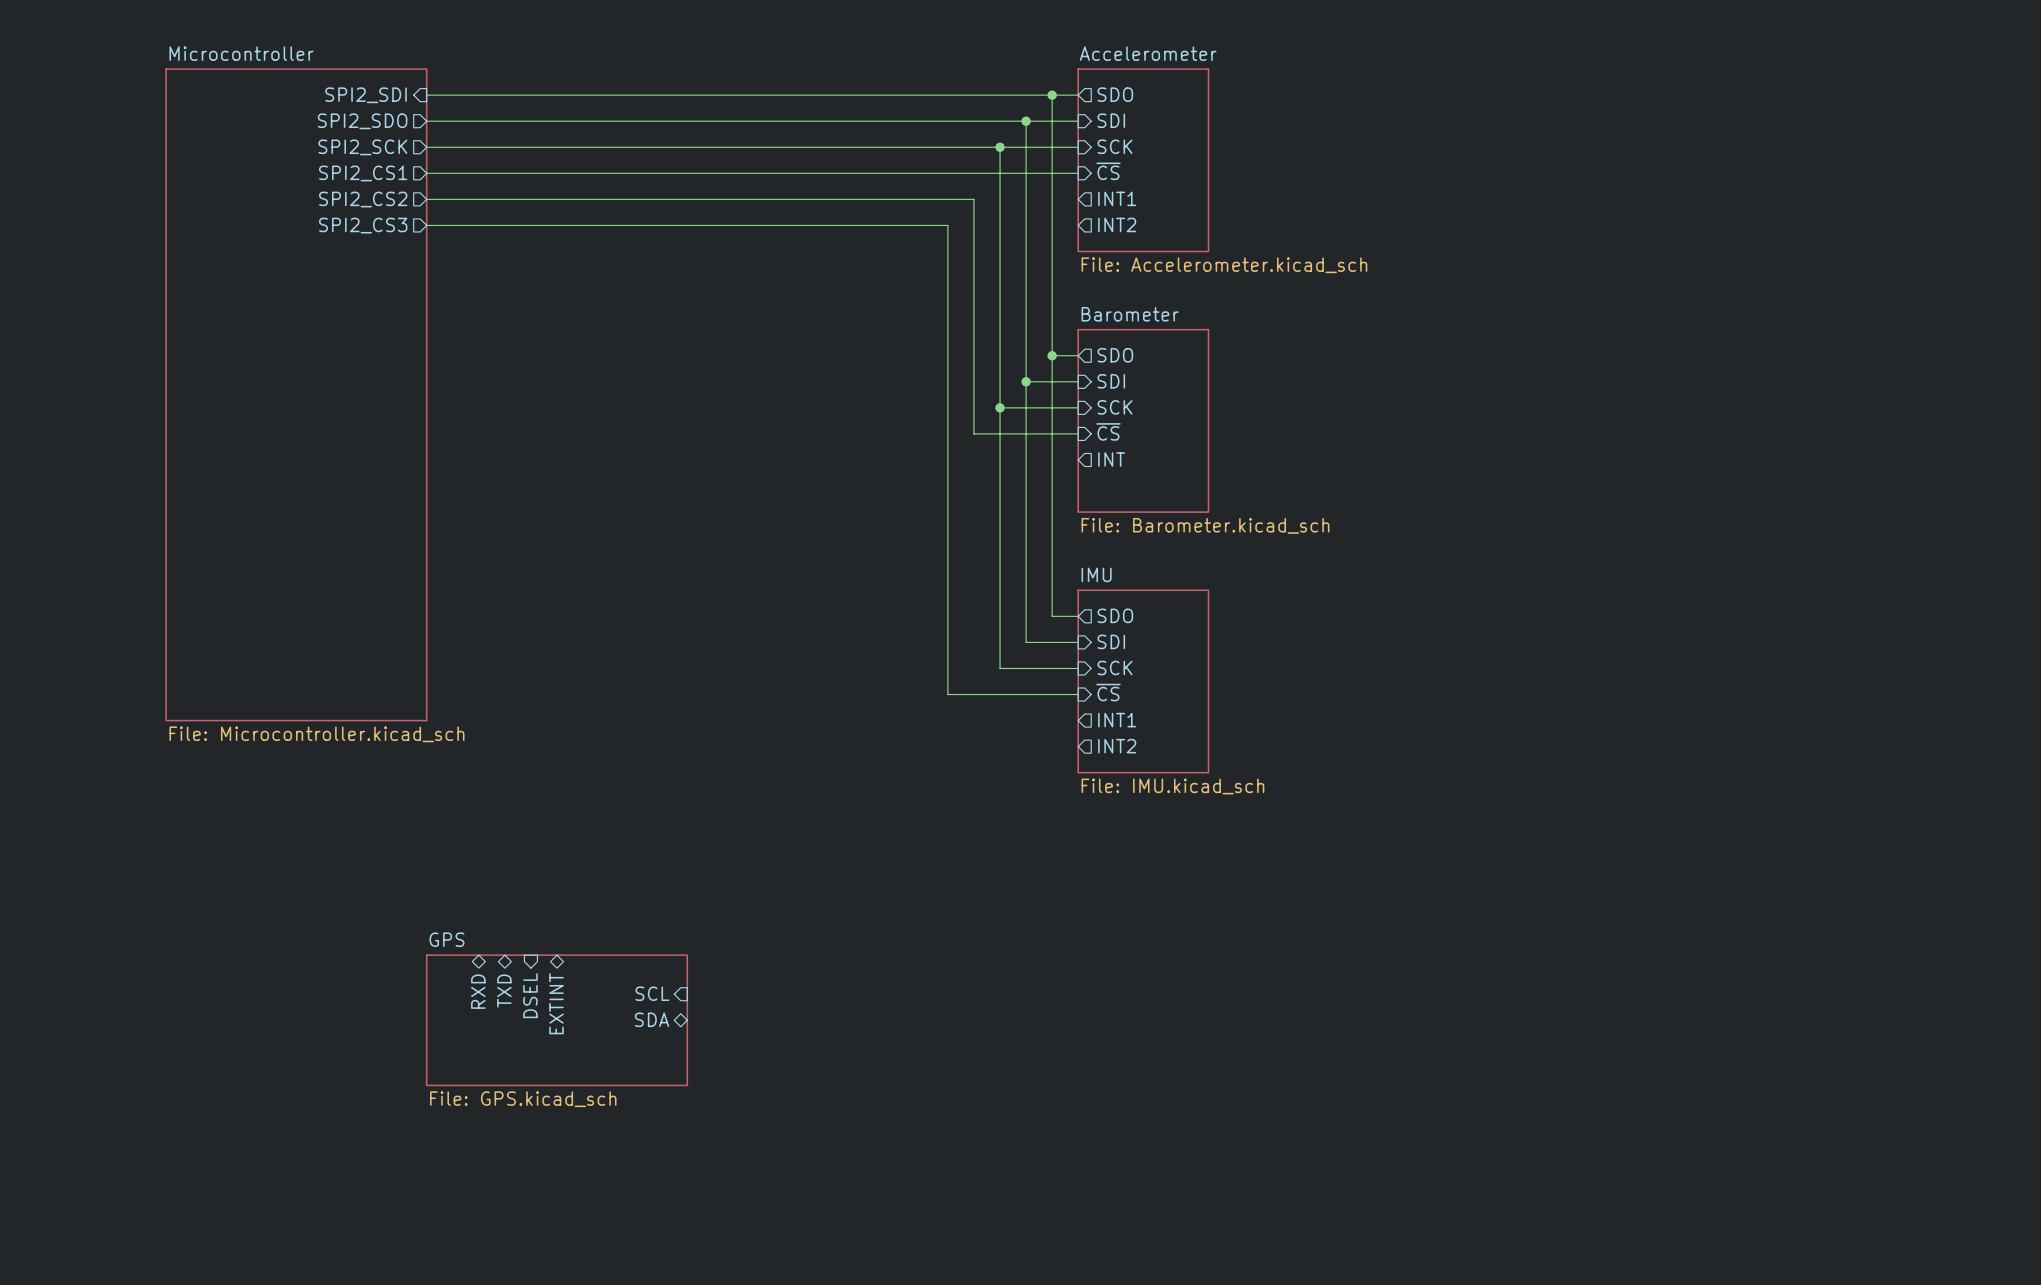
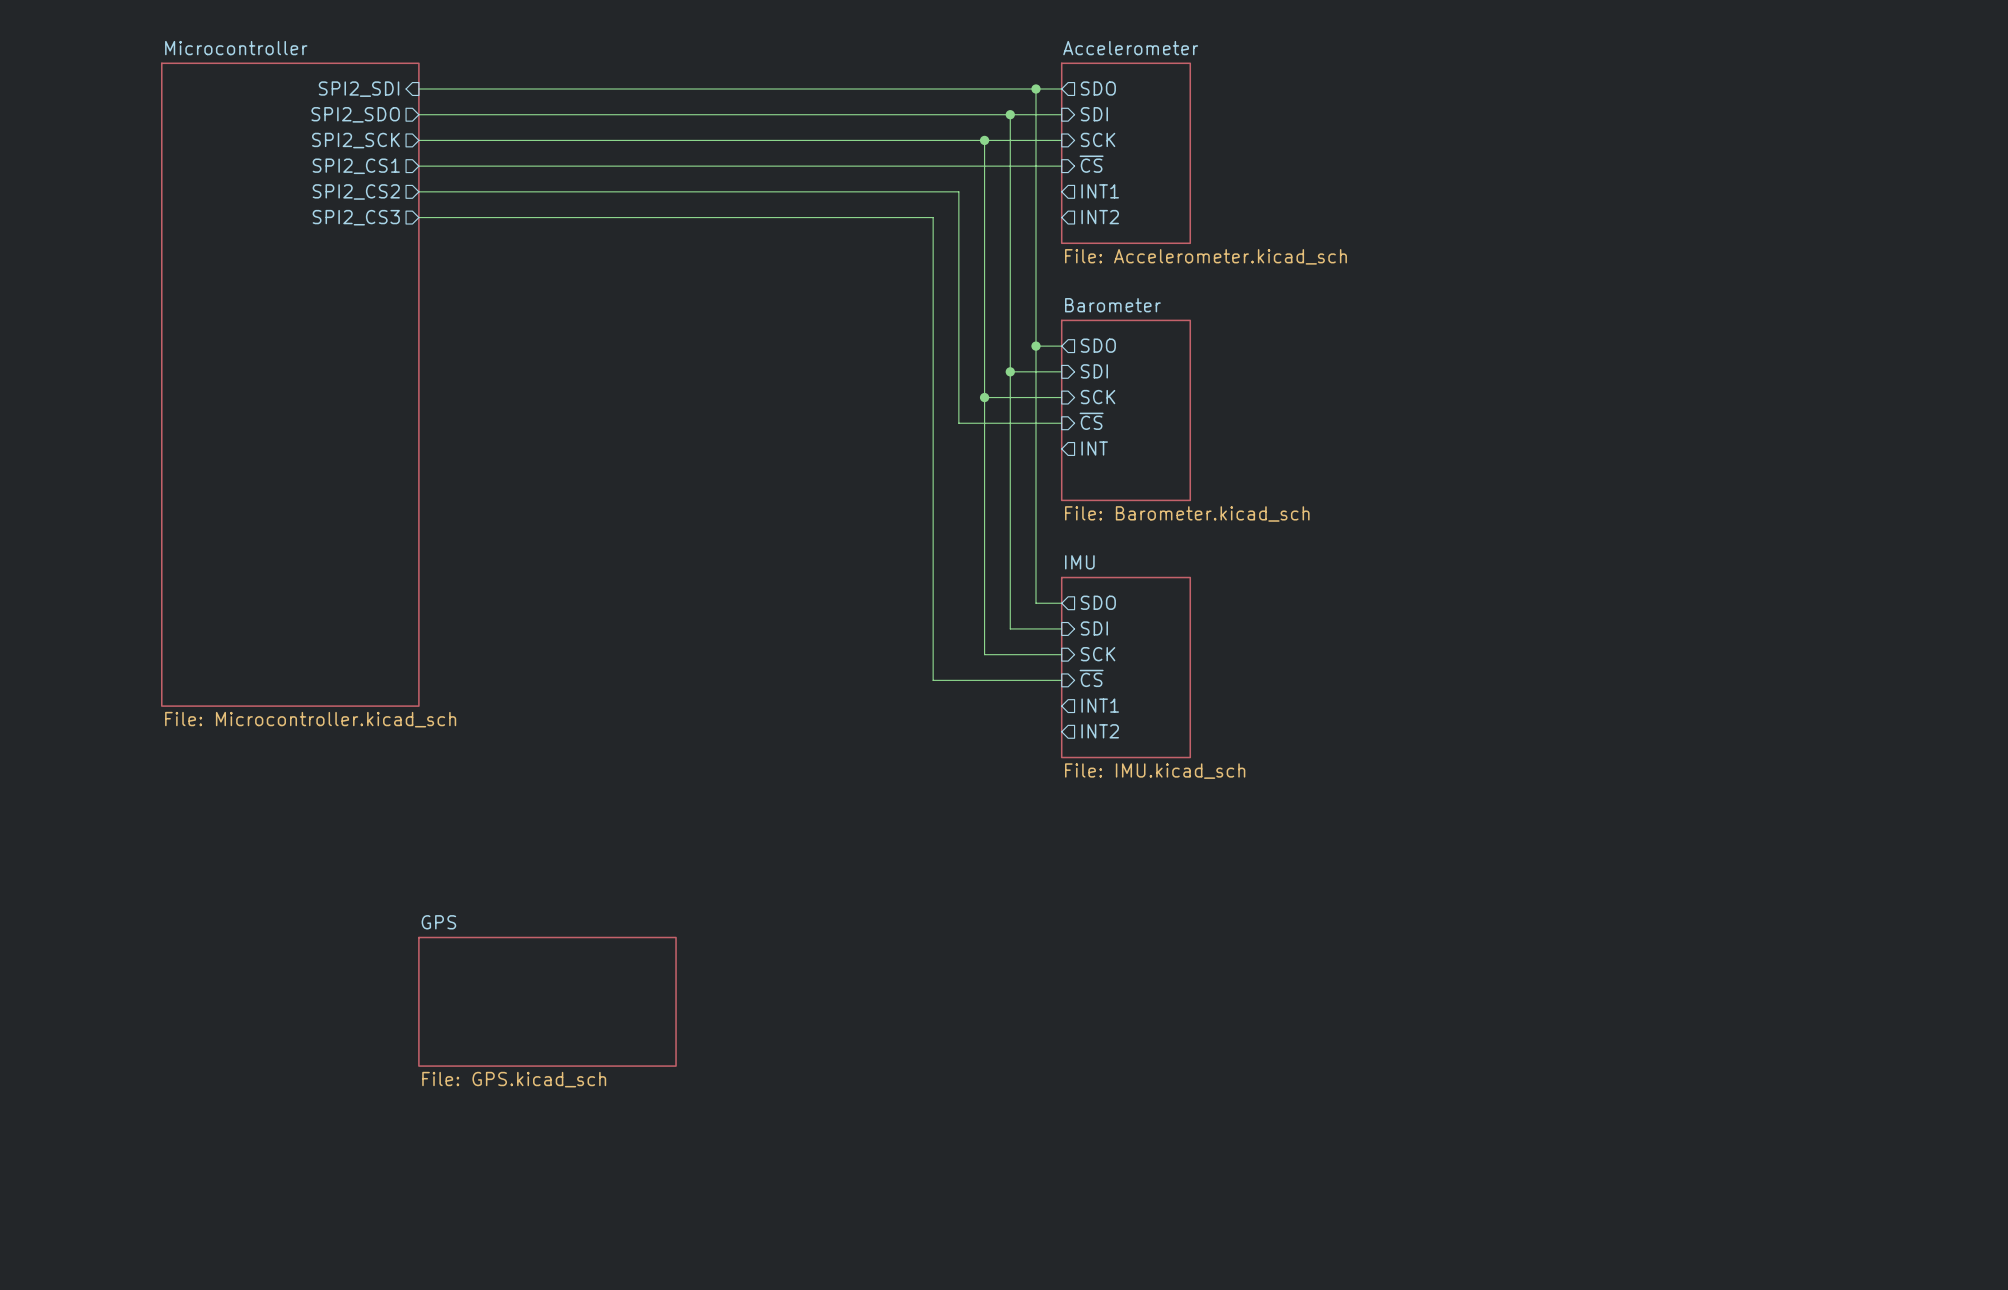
sheet pin: RXD (478, 991) -> none
sheet pin: TXD (504, 991) -> none
sheet pin: SCL (652, 993) -> none
sheet pin: DSEL (530, 995) -> none
sheet pin: EXTINT (556, 1003) -> none
sheet pin: SDA (652, 1019) -> none

